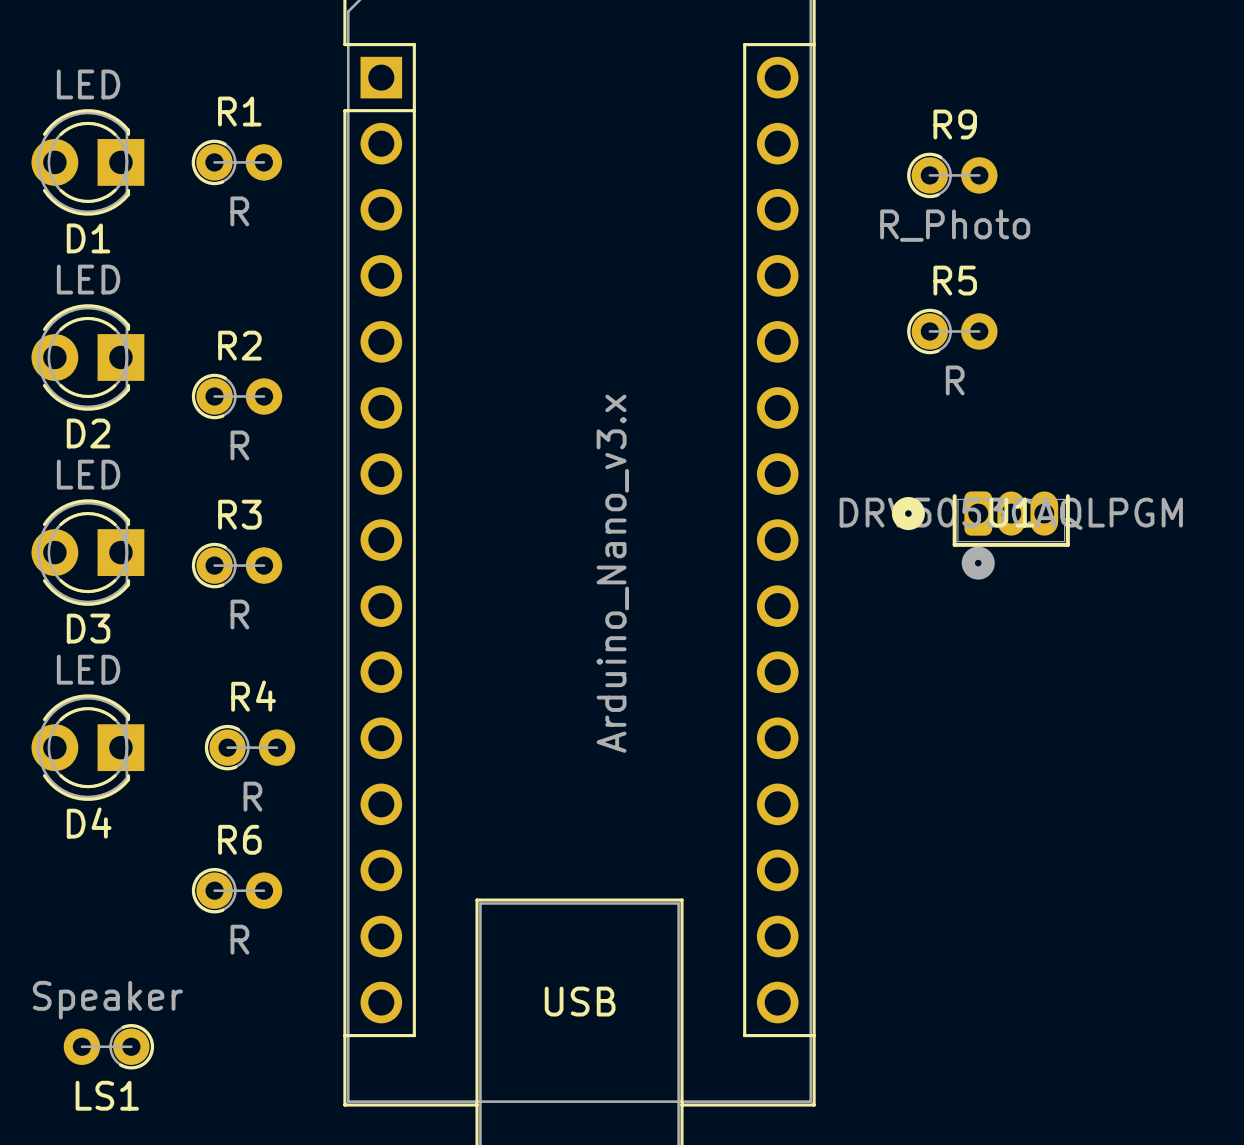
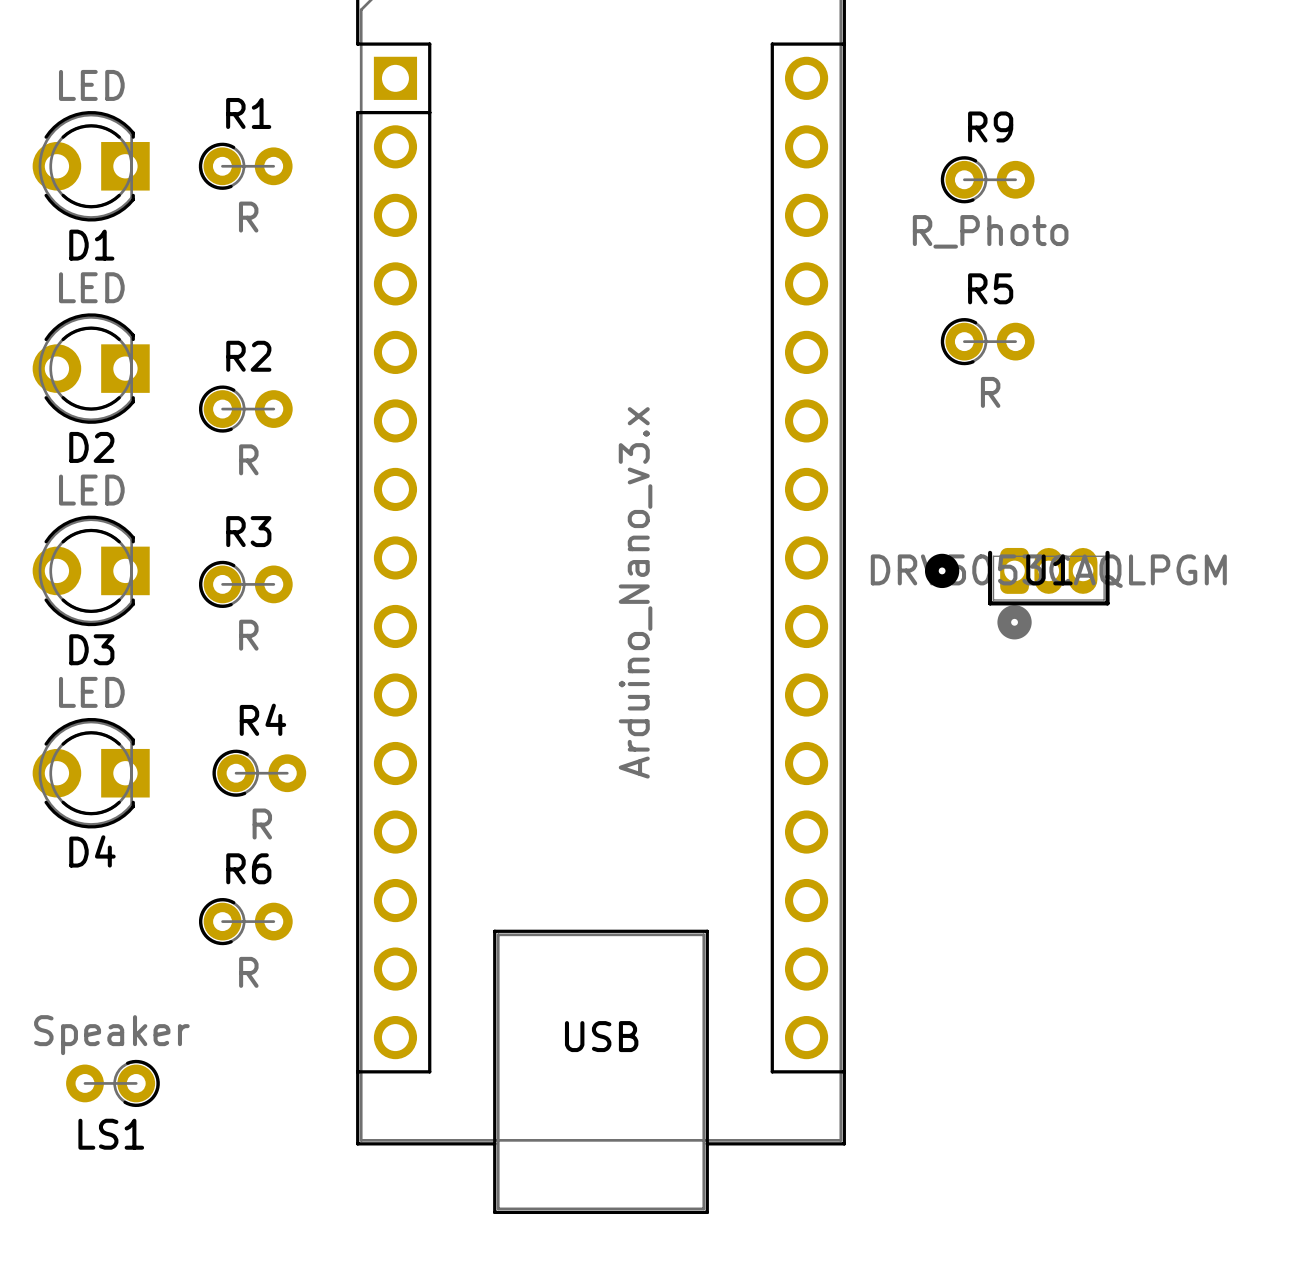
U1 position: (980, 535) -> (1017, 593)

